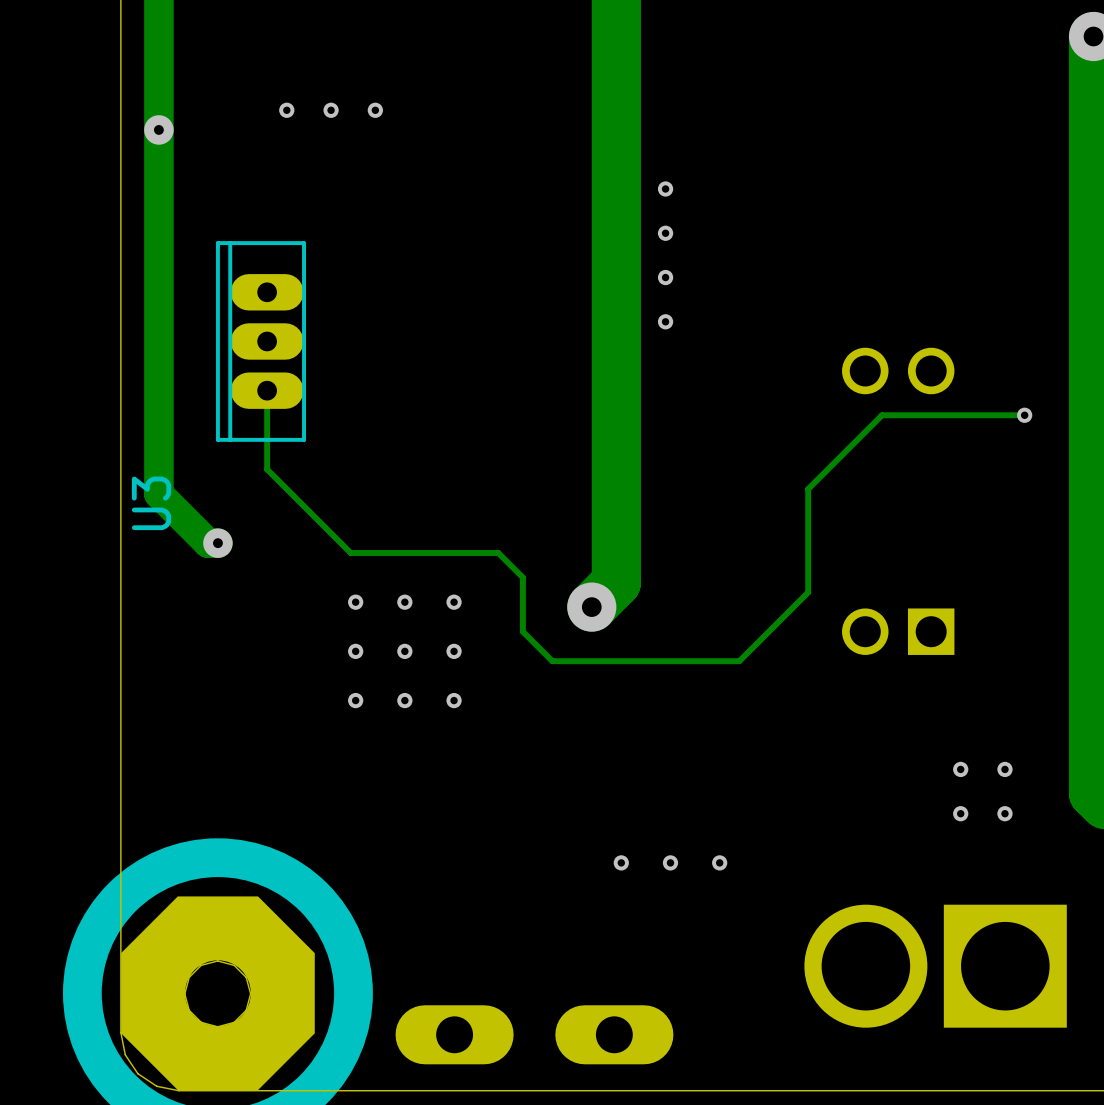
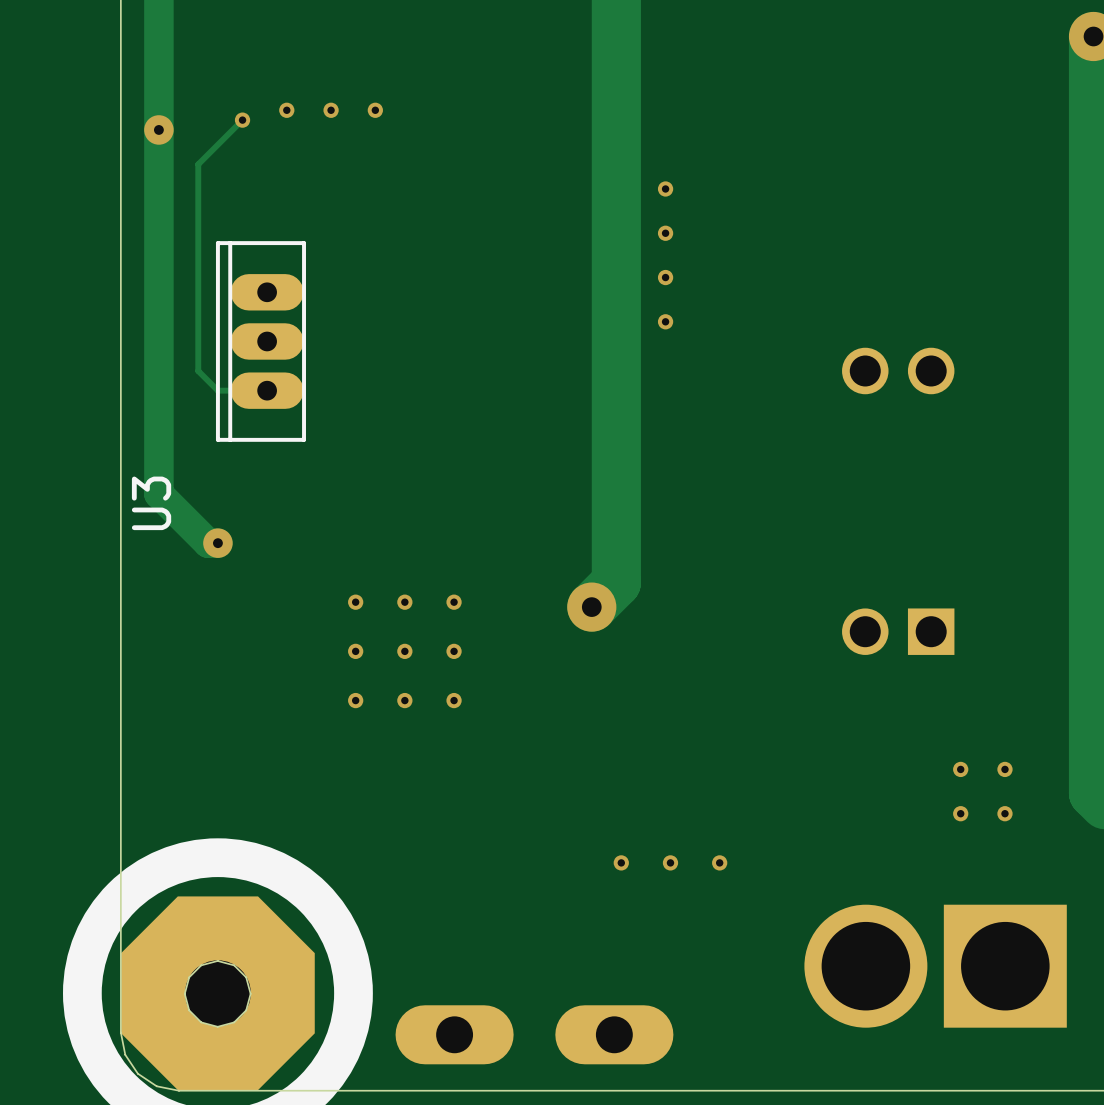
via: none -> (242, 120)
track: (267, 390) (267, 469) (350, 552) (498, 552) (522, 577) (522, 631) (552, 661) (739, 661) (808, 592) (808, 489) (882, 415) (1024, 415) -> (267, 390) (217, 390) (198, 370) (198, 164) (242, 120)
via: (1024, 415) -> none

